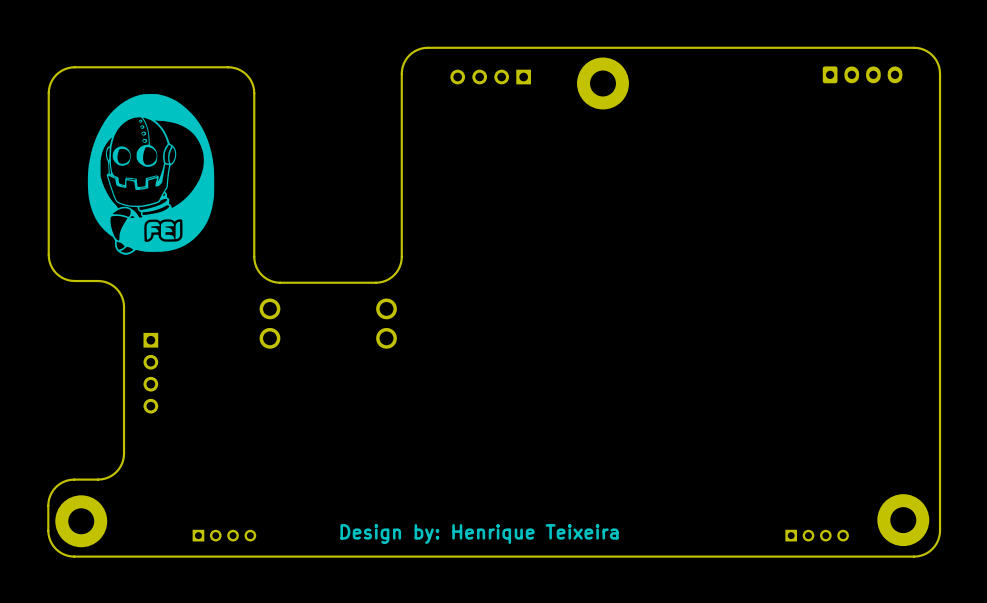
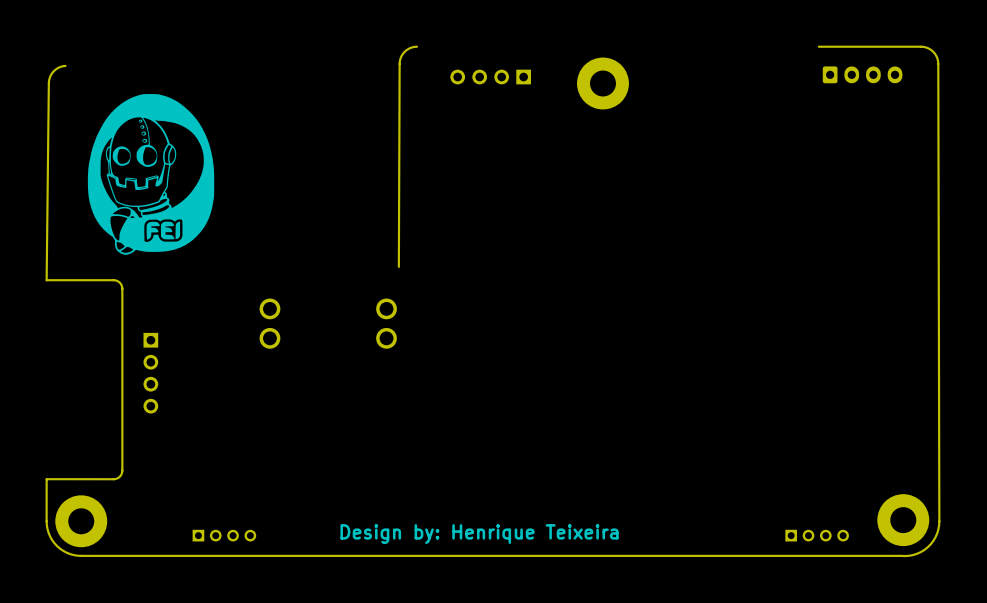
board edge: none -> (416, 46) (406, 50) (399, 61) (398, 266)
board edge: none -> (818, 46) (922, 46) (933, 51) (937, 60) (939, 521) (937, 533) (930, 544) (921, 551) (909, 555) (82, 555) (63, 550) (54, 543) (47, 529) (46, 479) (114, 479) (119, 476) (122, 470) (121, 286) (114, 280) (46, 280) (48, 81) (53, 71) (65, 65)
board edge: (914, 47) (427, 47) (417, 49) (407, 57) (402, 70) (401, 260) (398, 269) (391, 277) (375, 282) (276, 282) (267, 279) (257, 269) (254, 256) (254, 89) (250, 80) (244, 72) (228, 67) (74, 67) (61, 70) (52, 80) (48, 89) (48, 258) (54, 270) (61, 277) (71, 280) (104, 281) (116, 288) (122, 297) (124, 306) (124, 453) (120, 466) (111, 476) (101, 479) (67, 480) (53, 489) (48, 505) (48, 534) (51, 543) (61, 553) (74, 556) (914, 556) (927, 553) (936, 543) (940, 530) (940, 73) (938, 63) (932, 55) (924, 49) (914, 47) -> none

